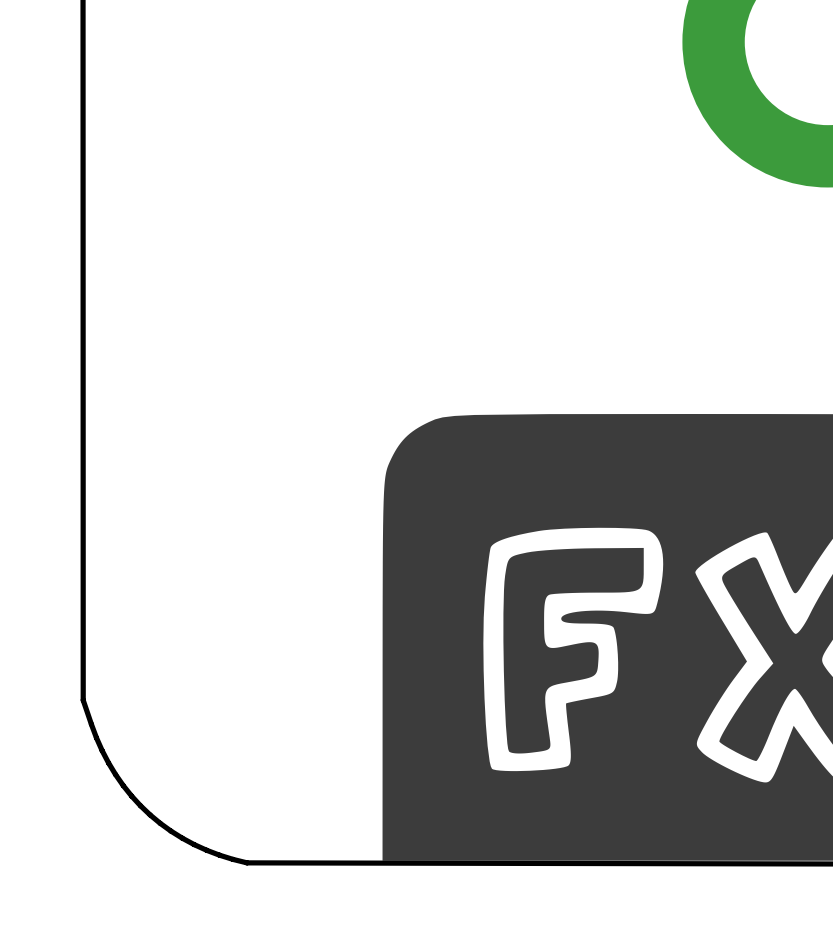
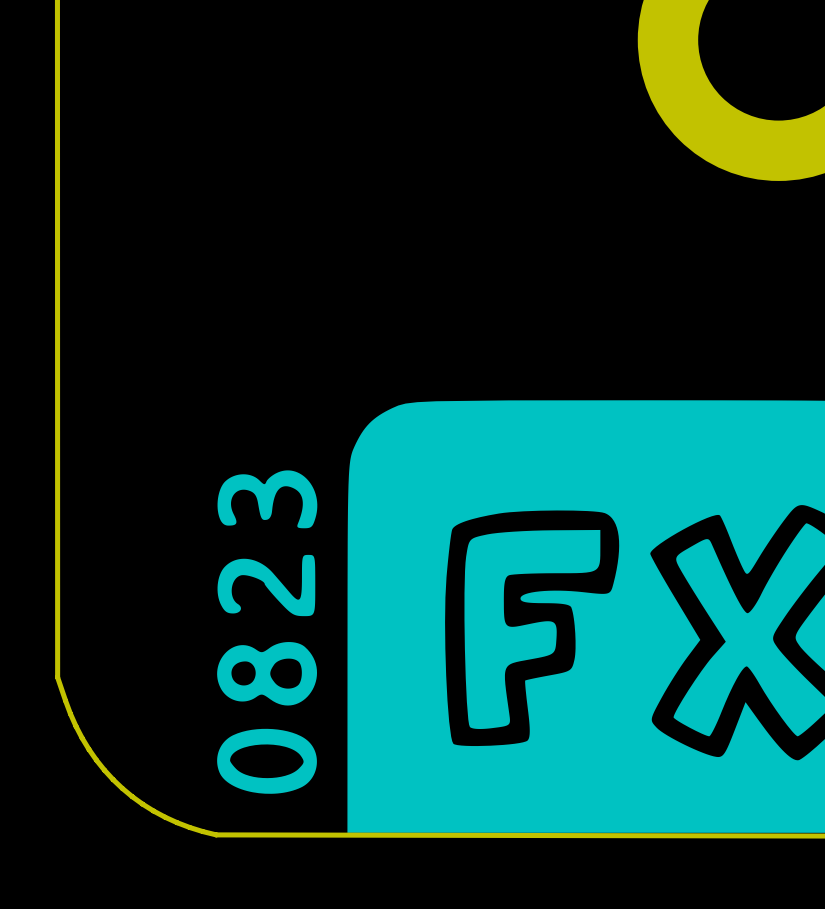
drawing: none -> [217, 470, 318, 794]

